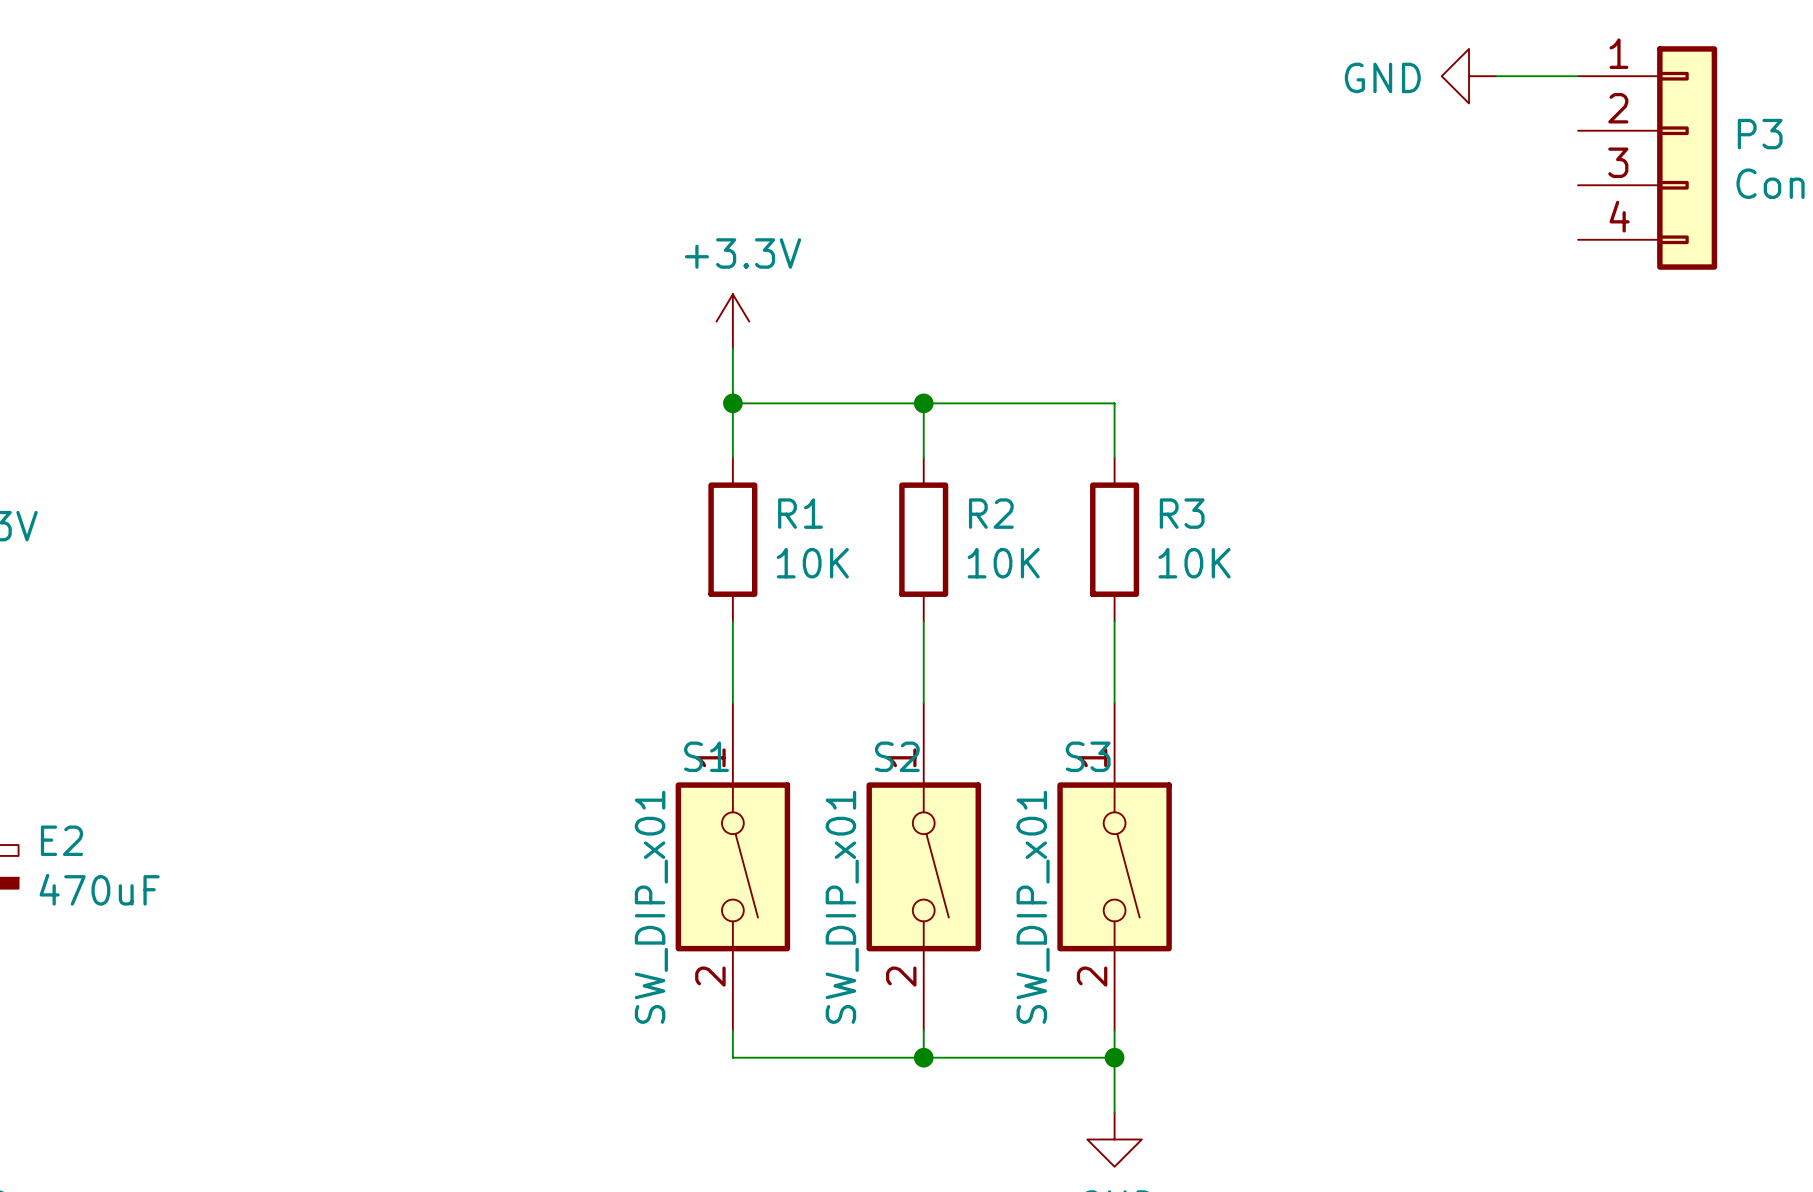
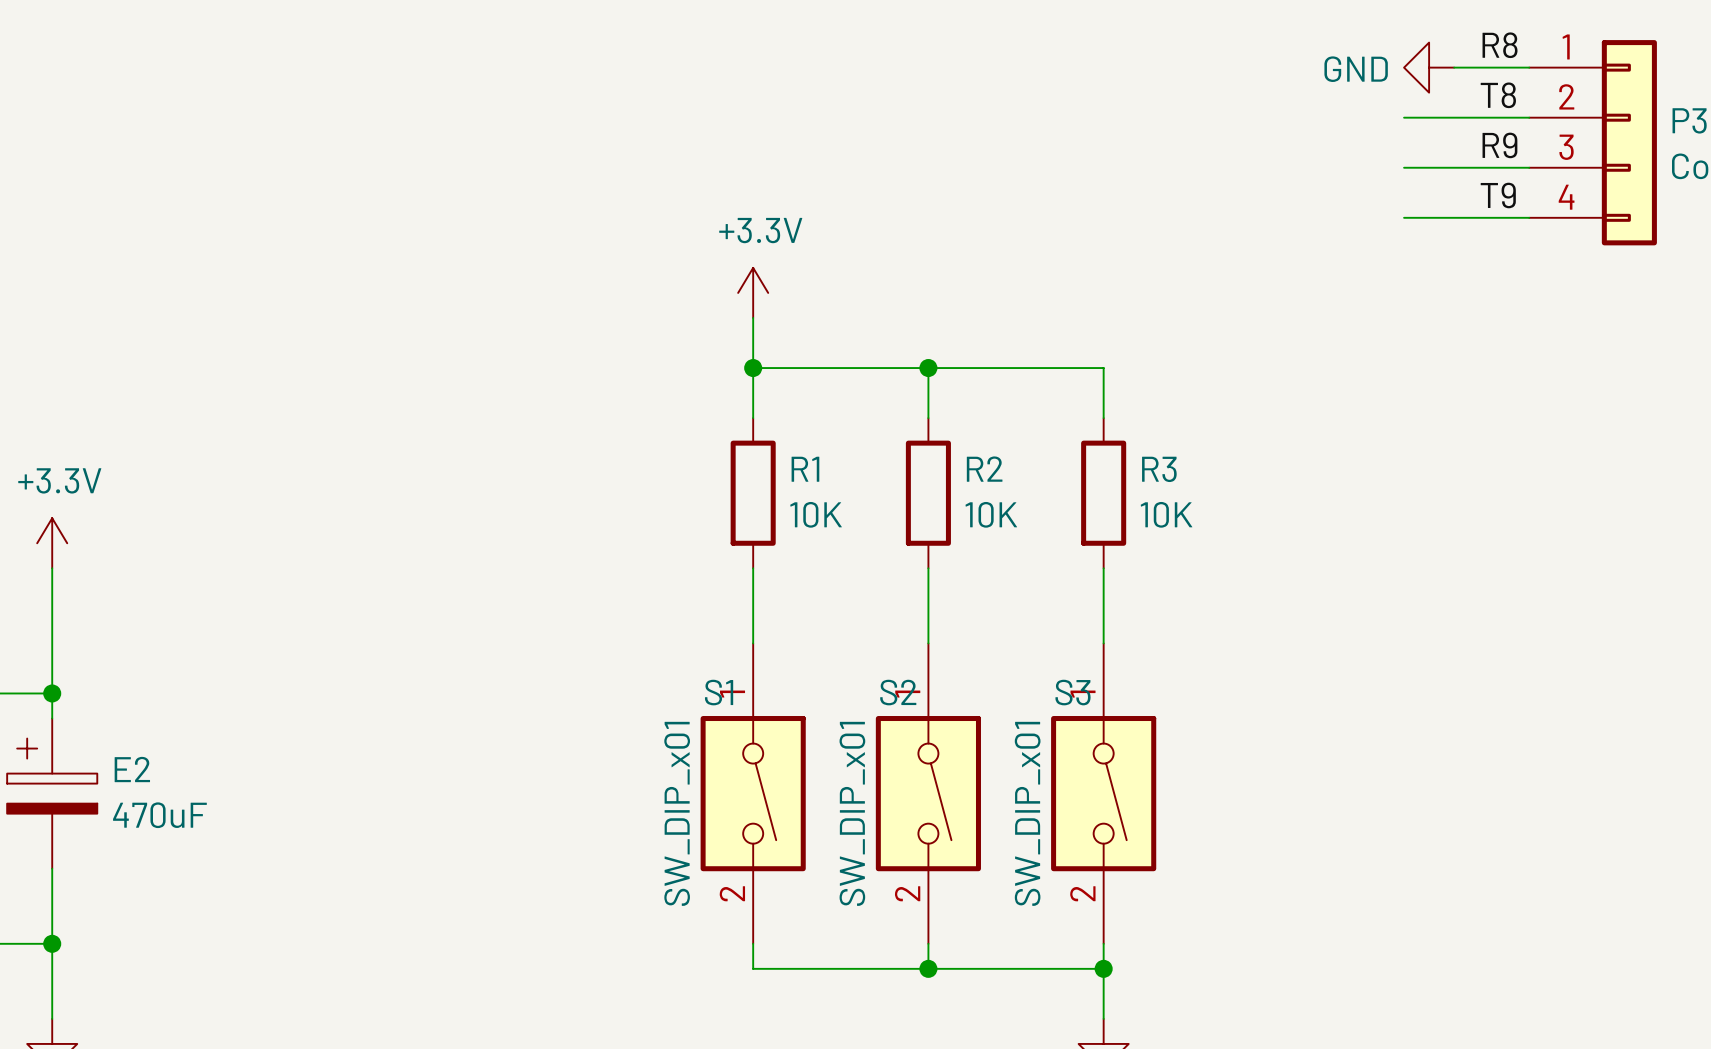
label: none -> R8 (1500, 45)
label: none -> T8 (1498, 95)
wire: none -> (1404, 117) (1529, 117)
label: none -> R9 (1499, 145)
wire: none -> (1404, 167) (1529, 167)
label: none -> T9 (1498, 195)
wire: none -> (1404, 217) (1529, 217)

